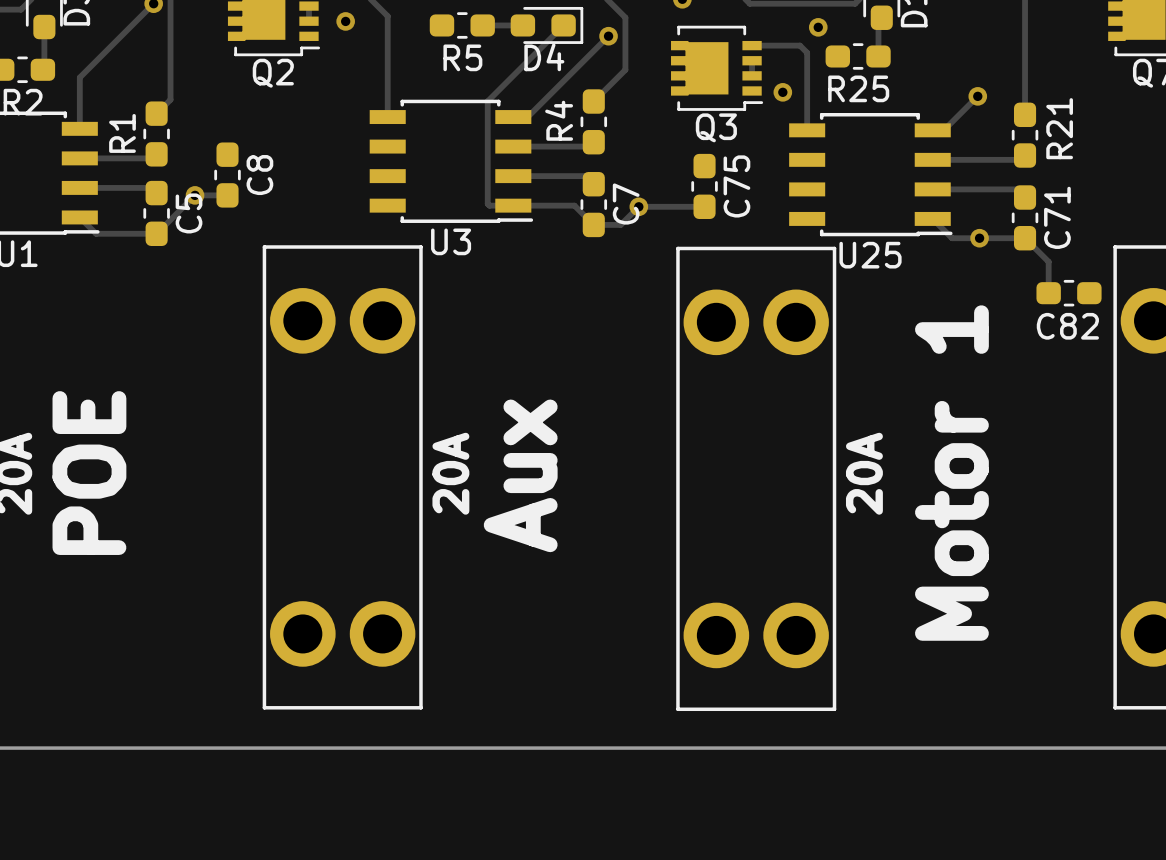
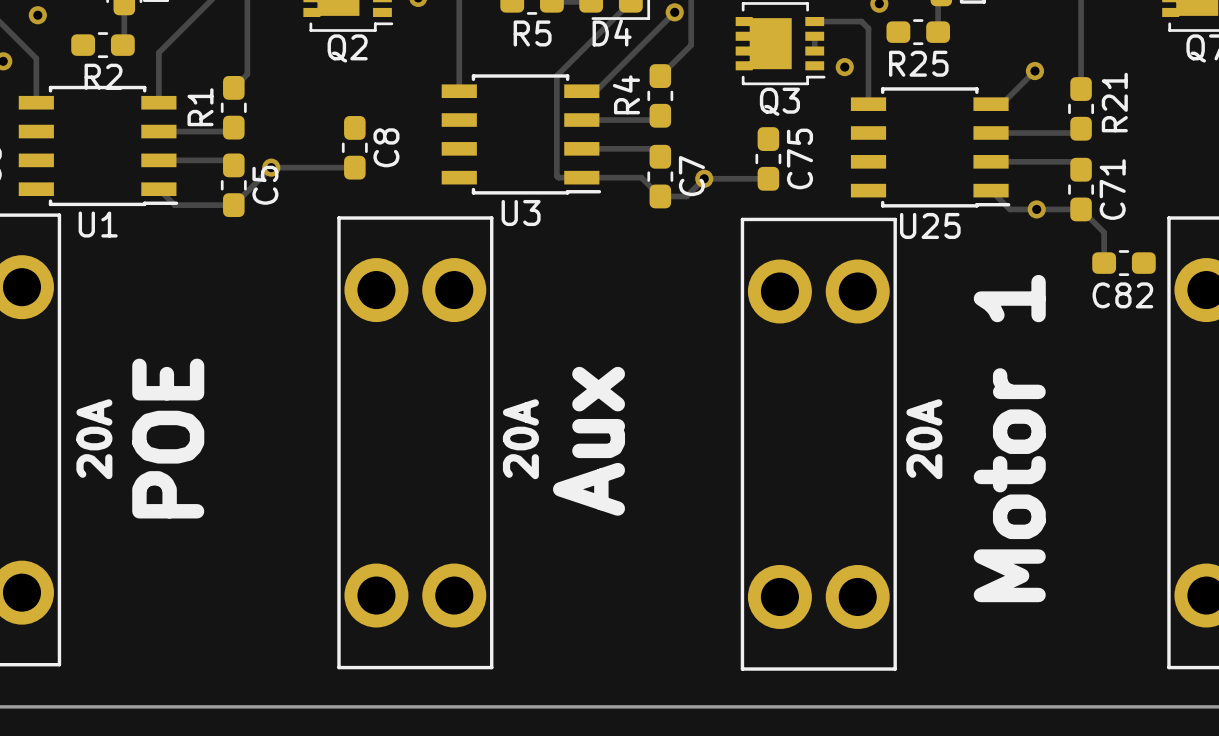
C8 position: (227, 175) -> (354, 147)
track: none -> (302, 167) (354, 167)

